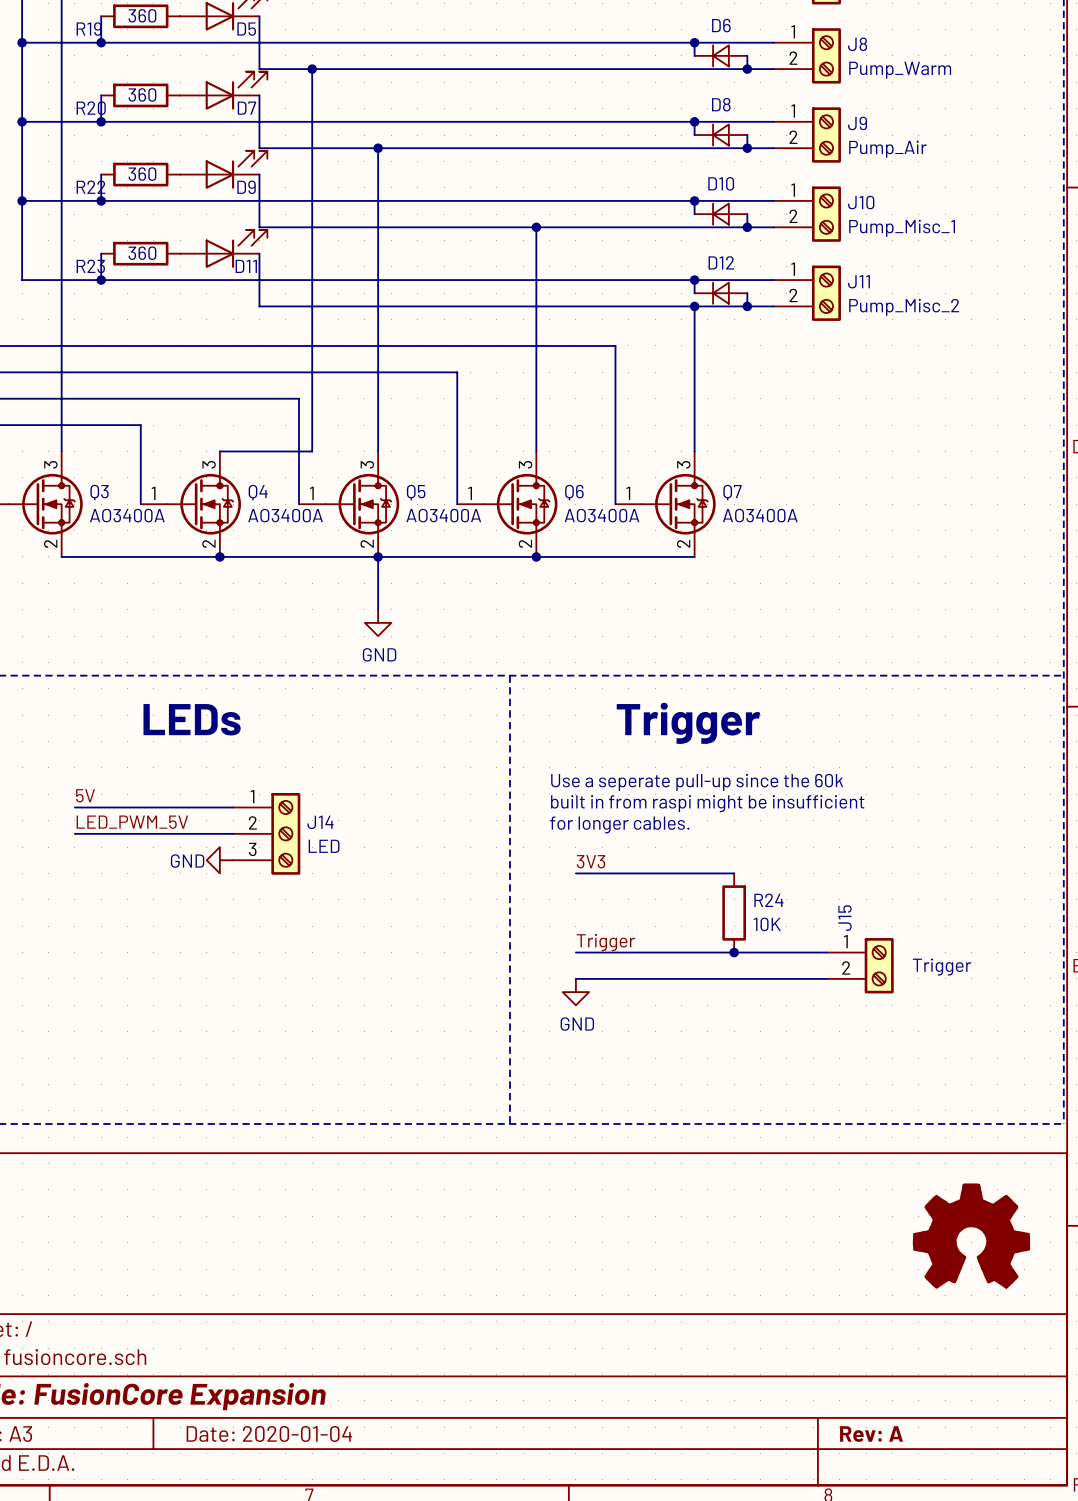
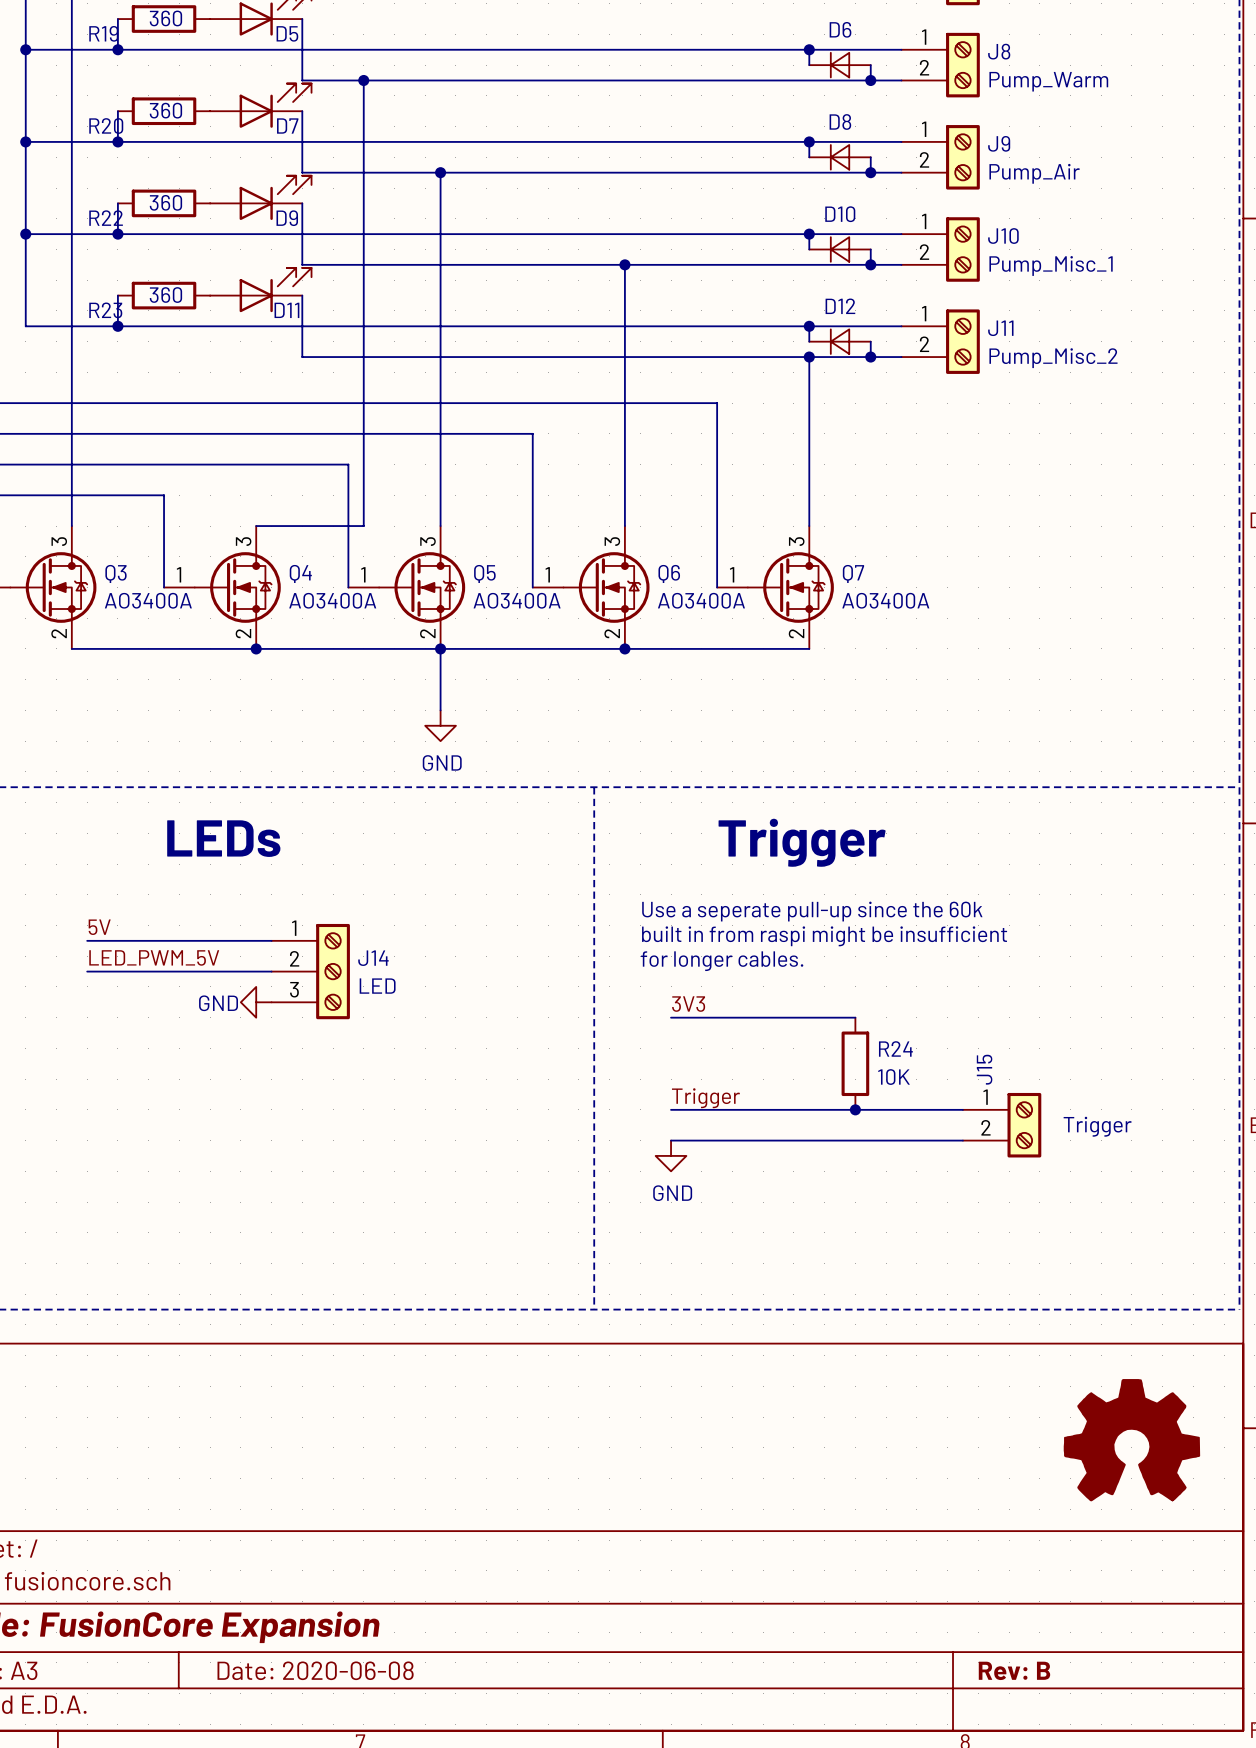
title block: Date: 2020-01-04 (269, 1433) -> Date: 2020-06-08 (315, 1670)
title block: Rev: A (871, 1434) -> Rev: B (1014, 1670)

